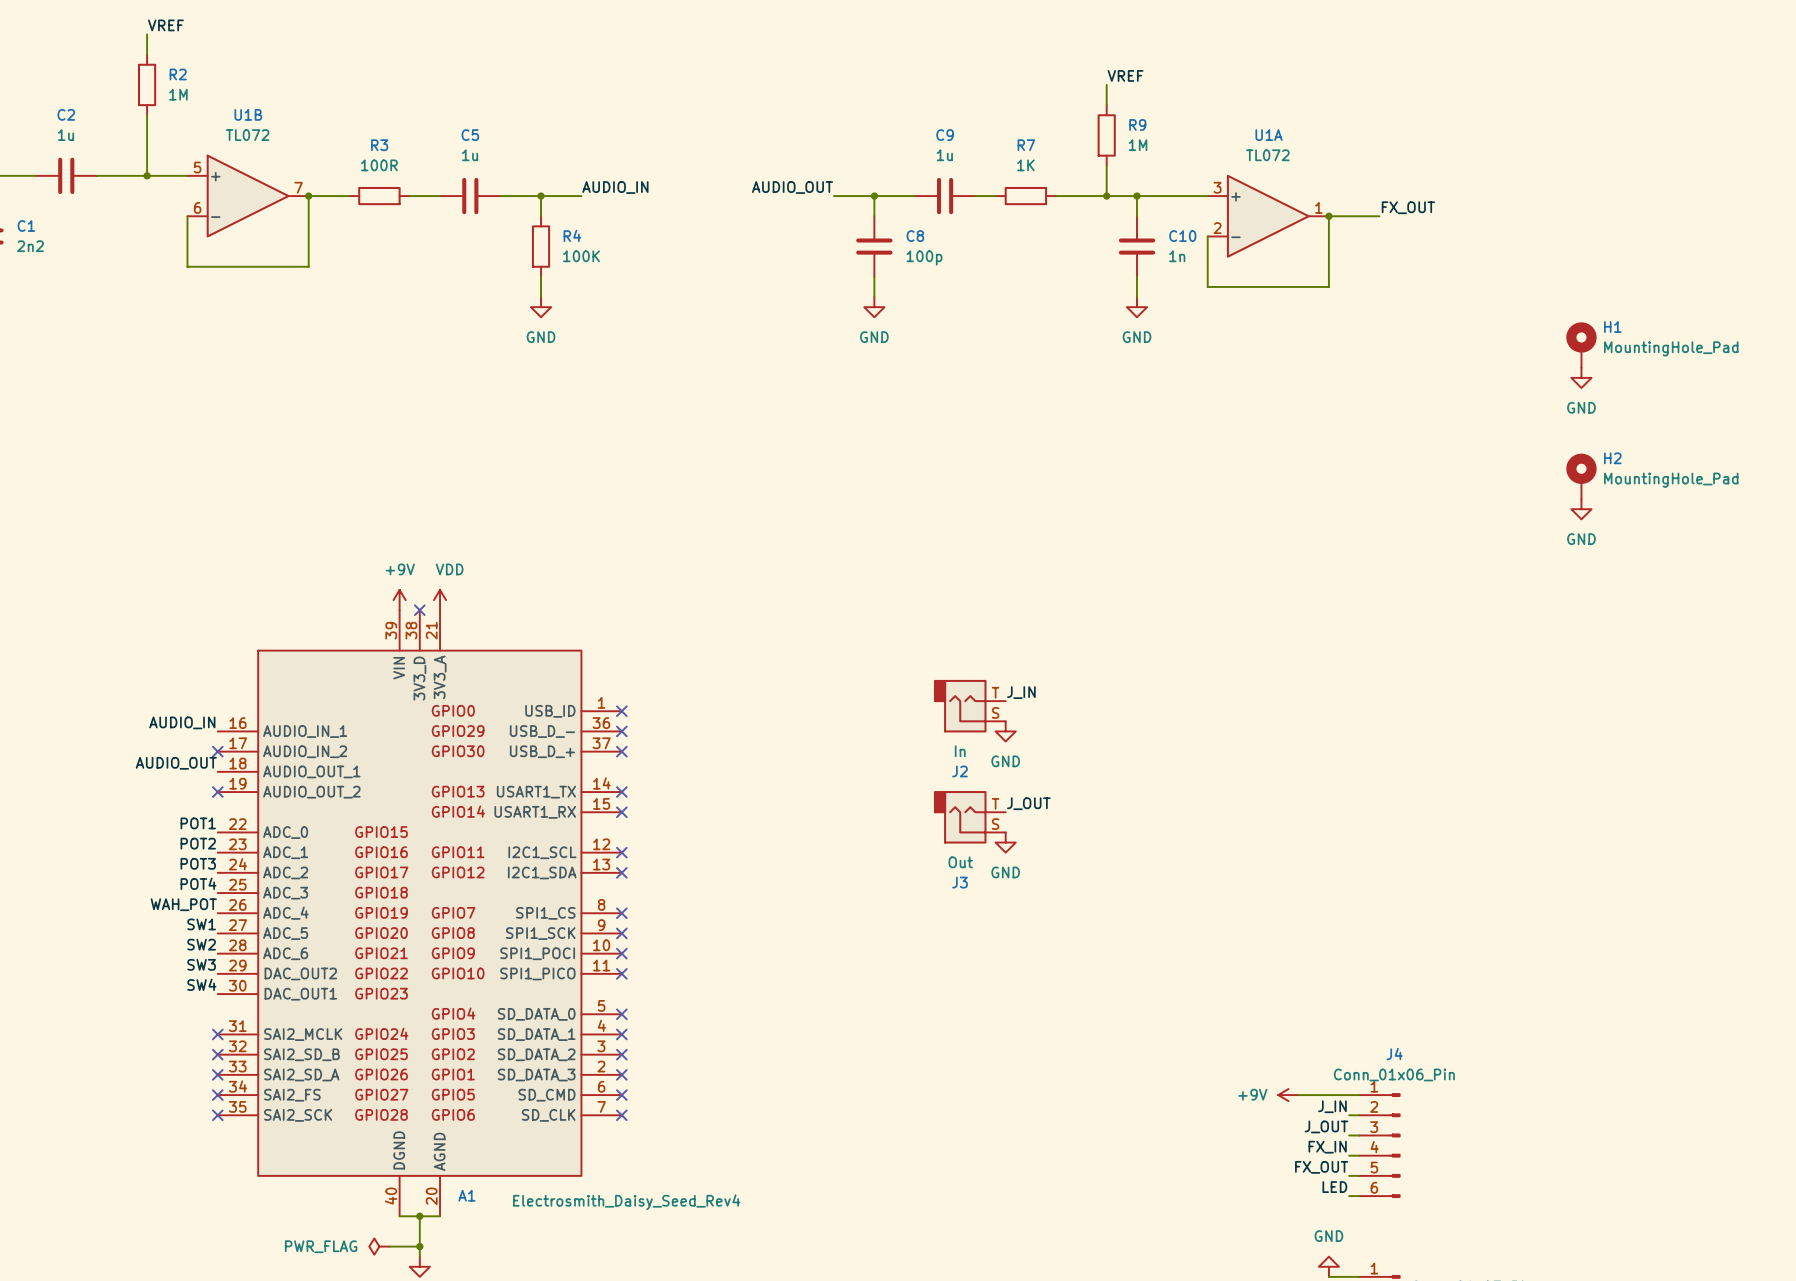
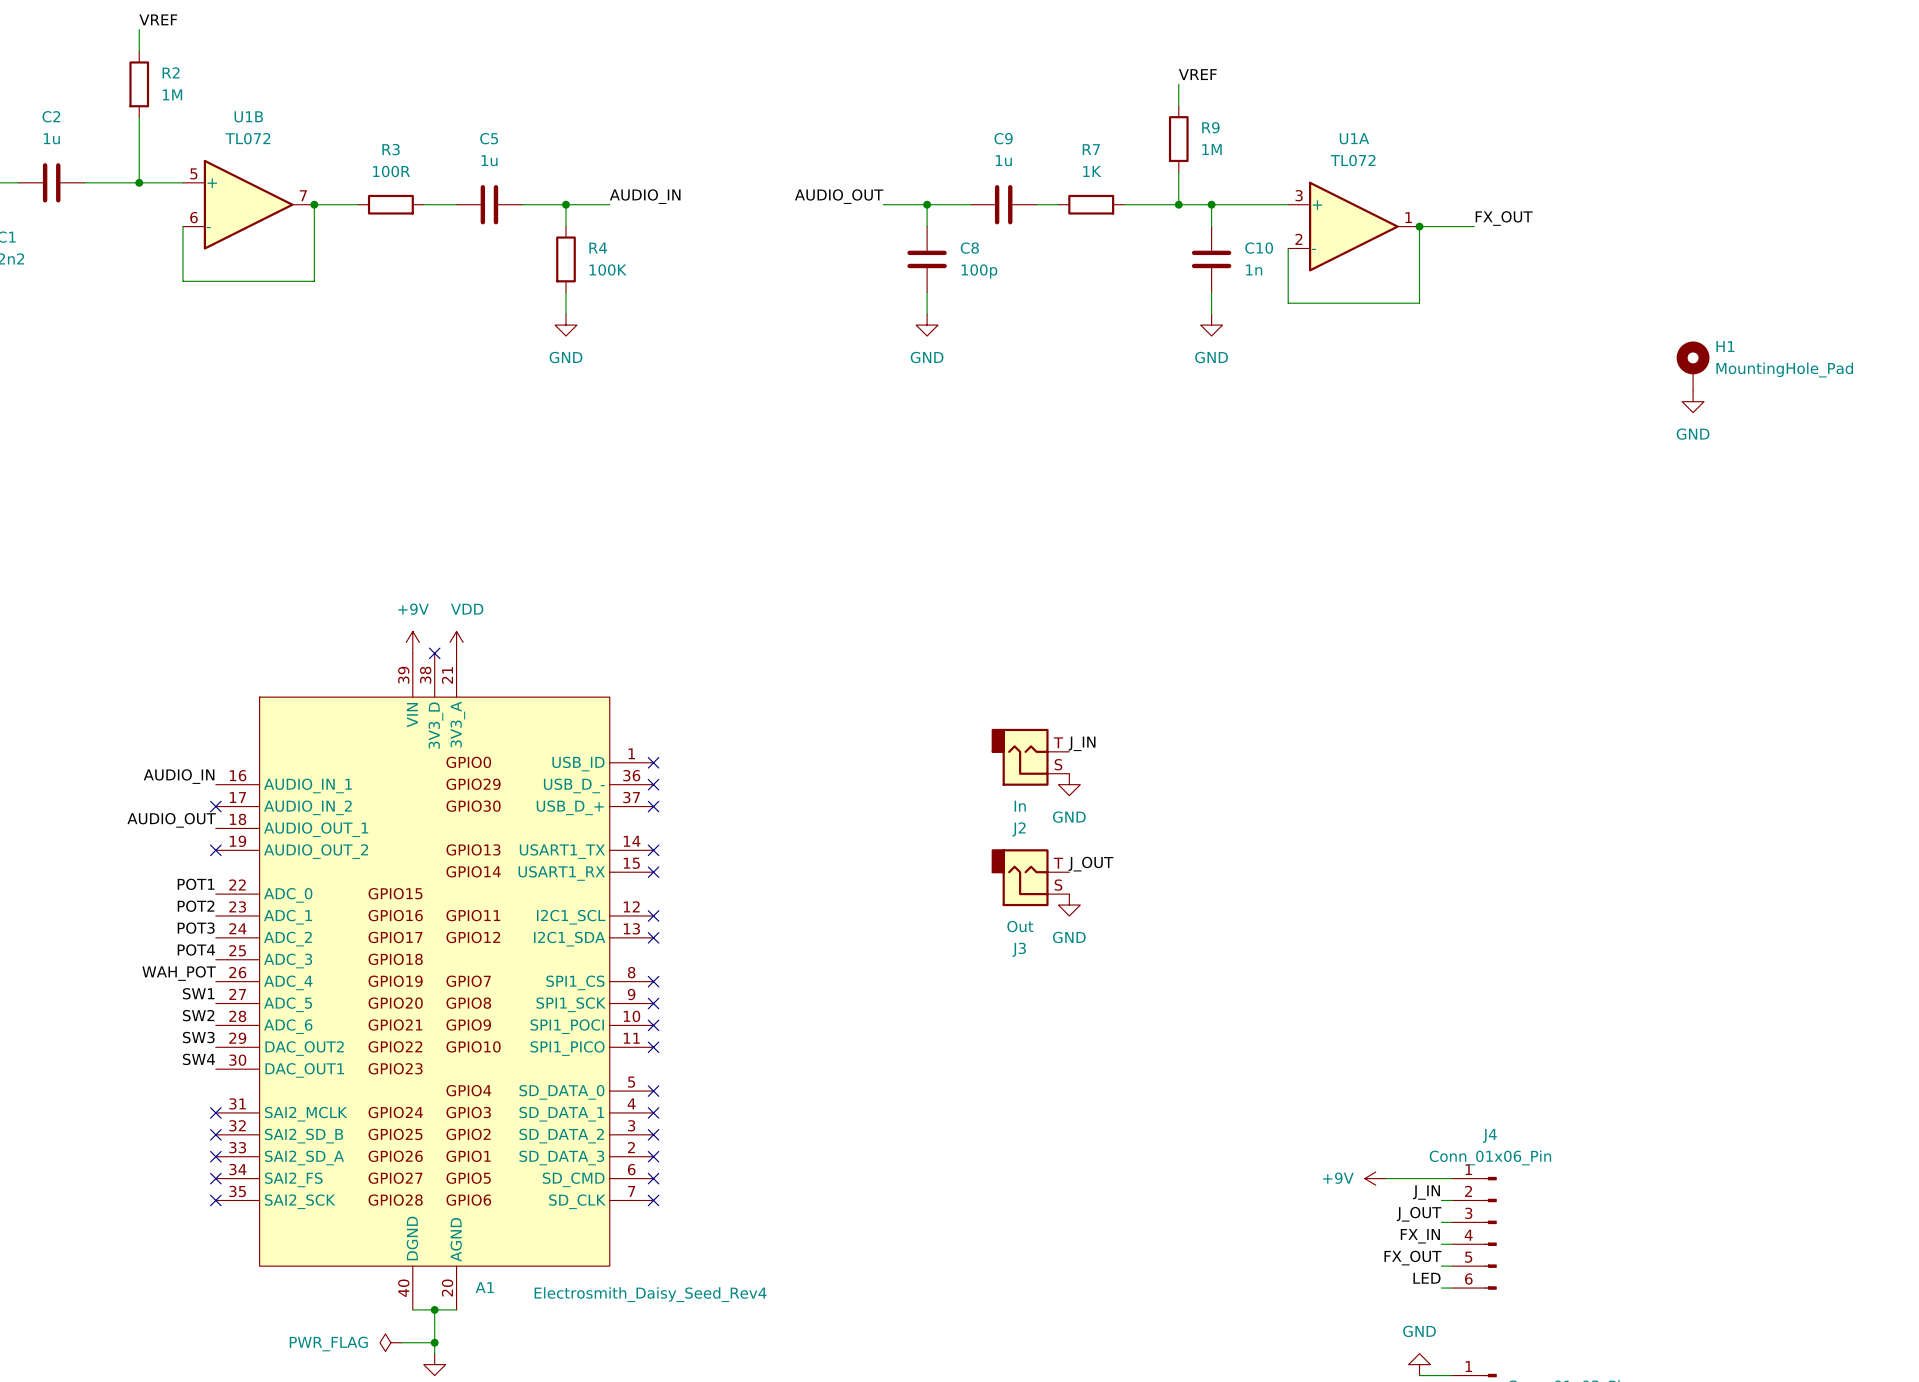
H2: MountingHole_Pad (1581, 476) -> none
power symbol: GND (1581, 509) -> none

